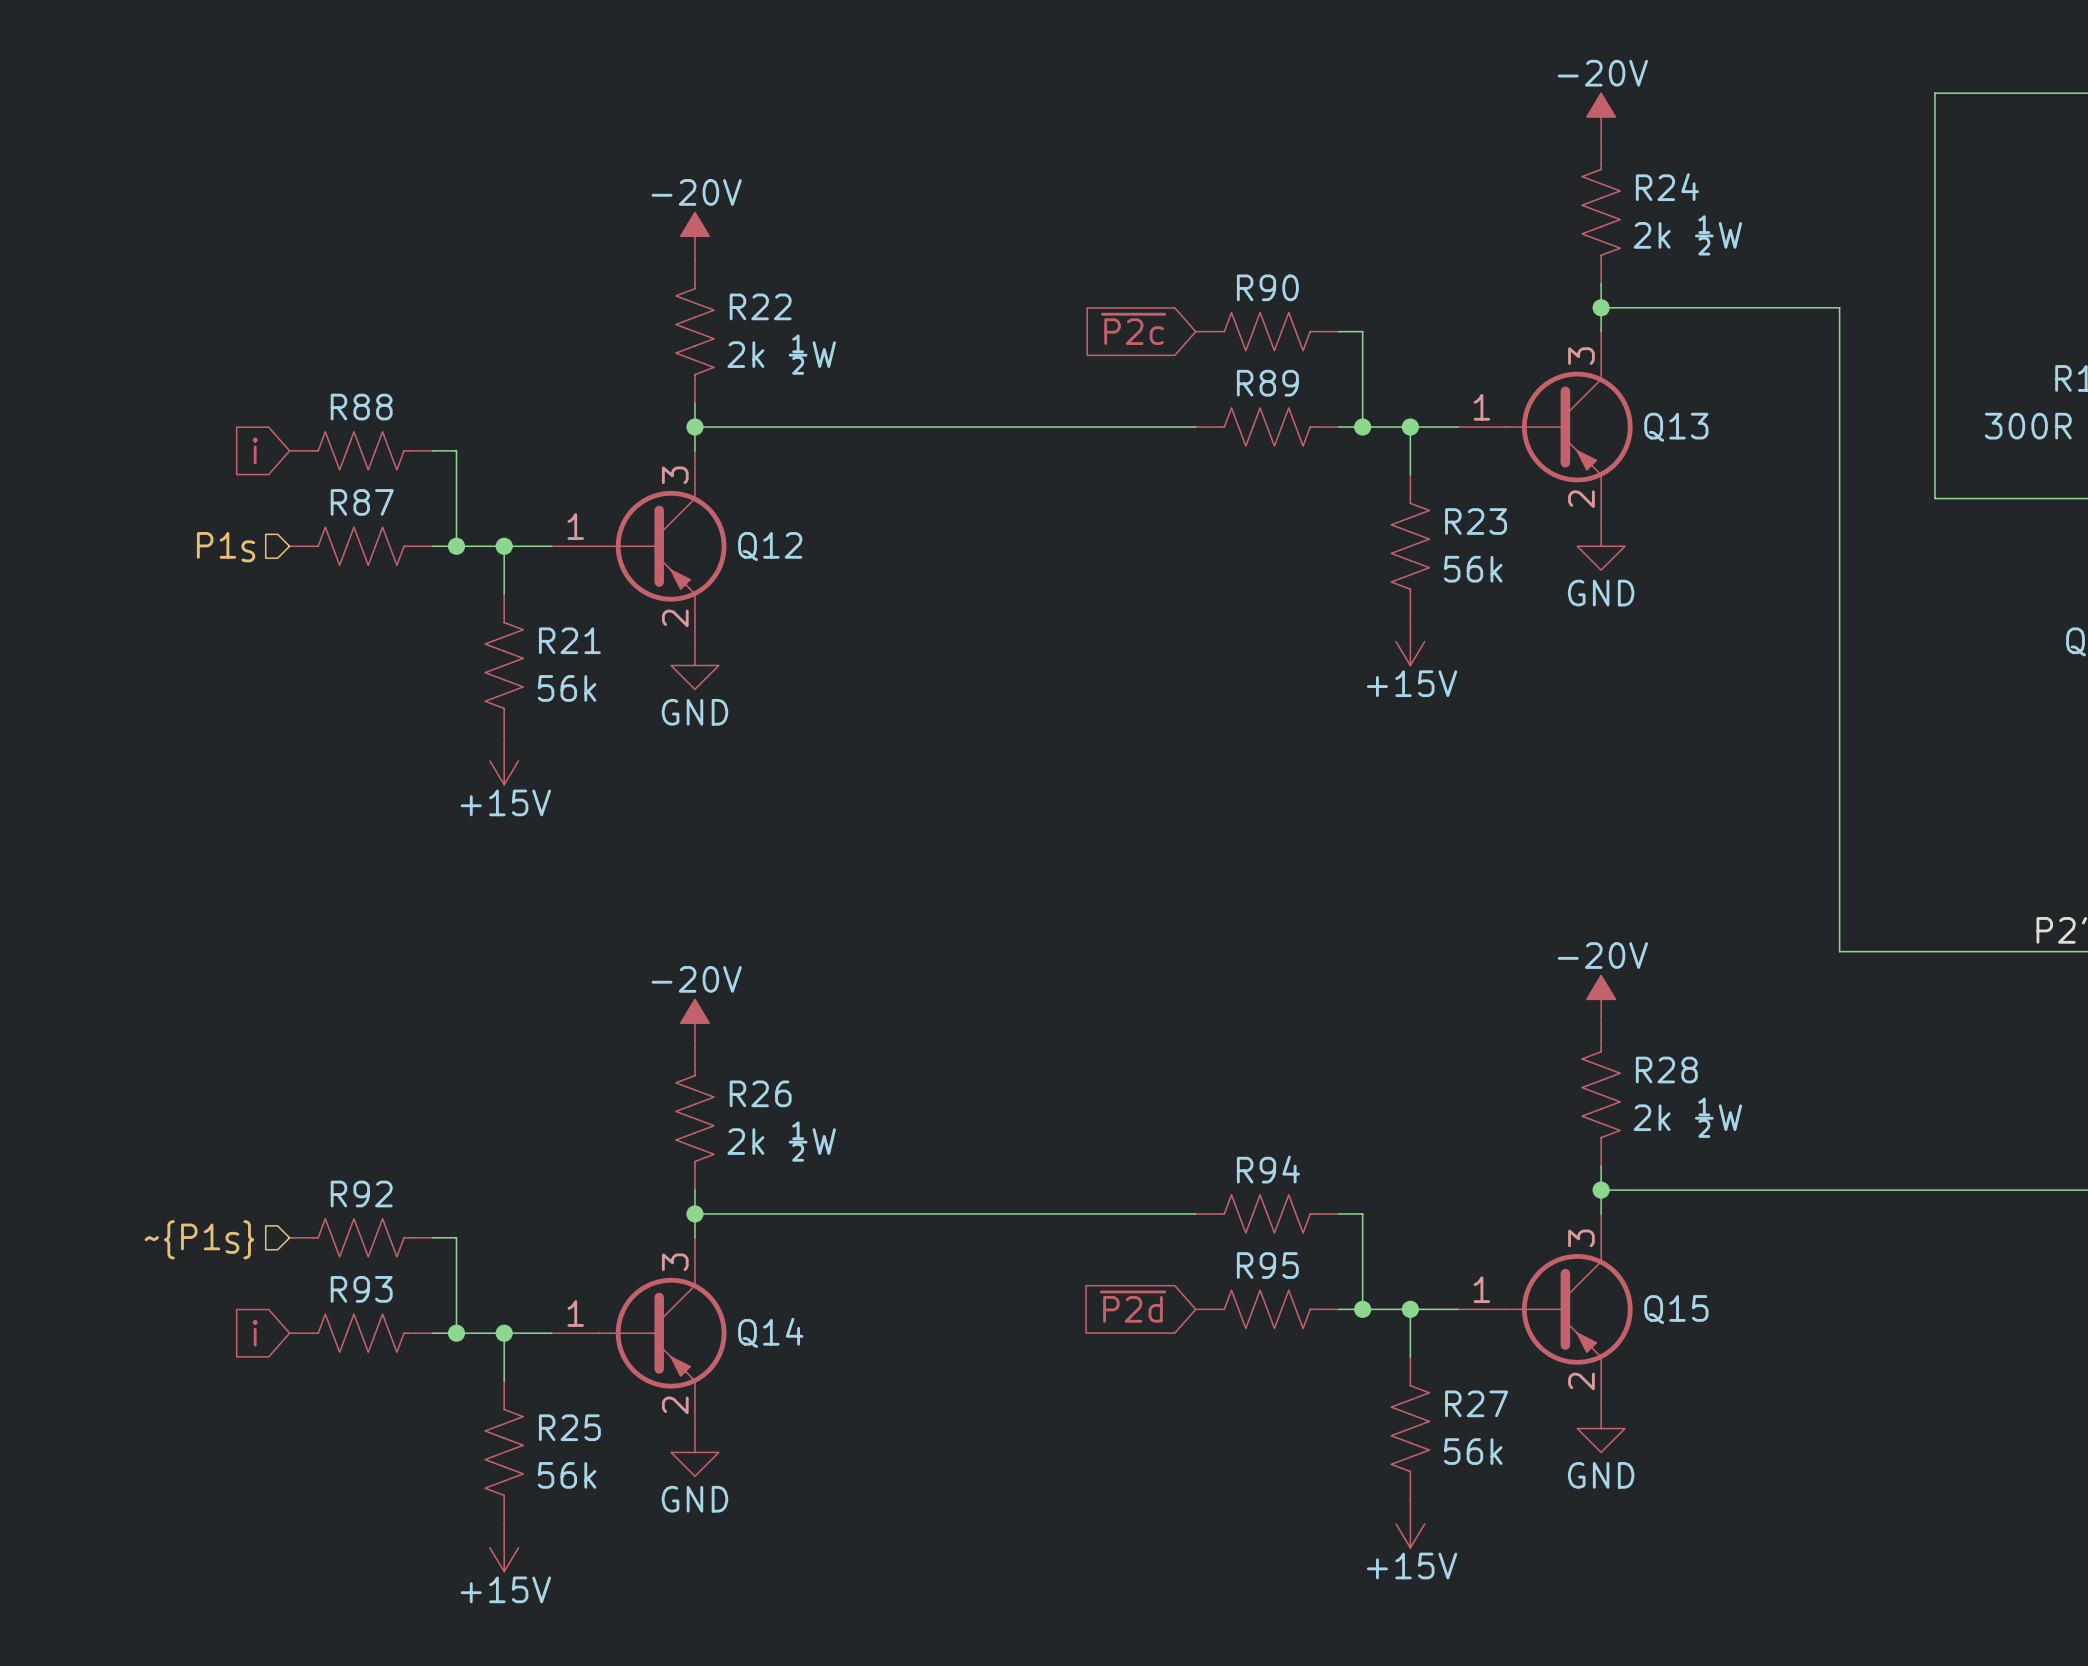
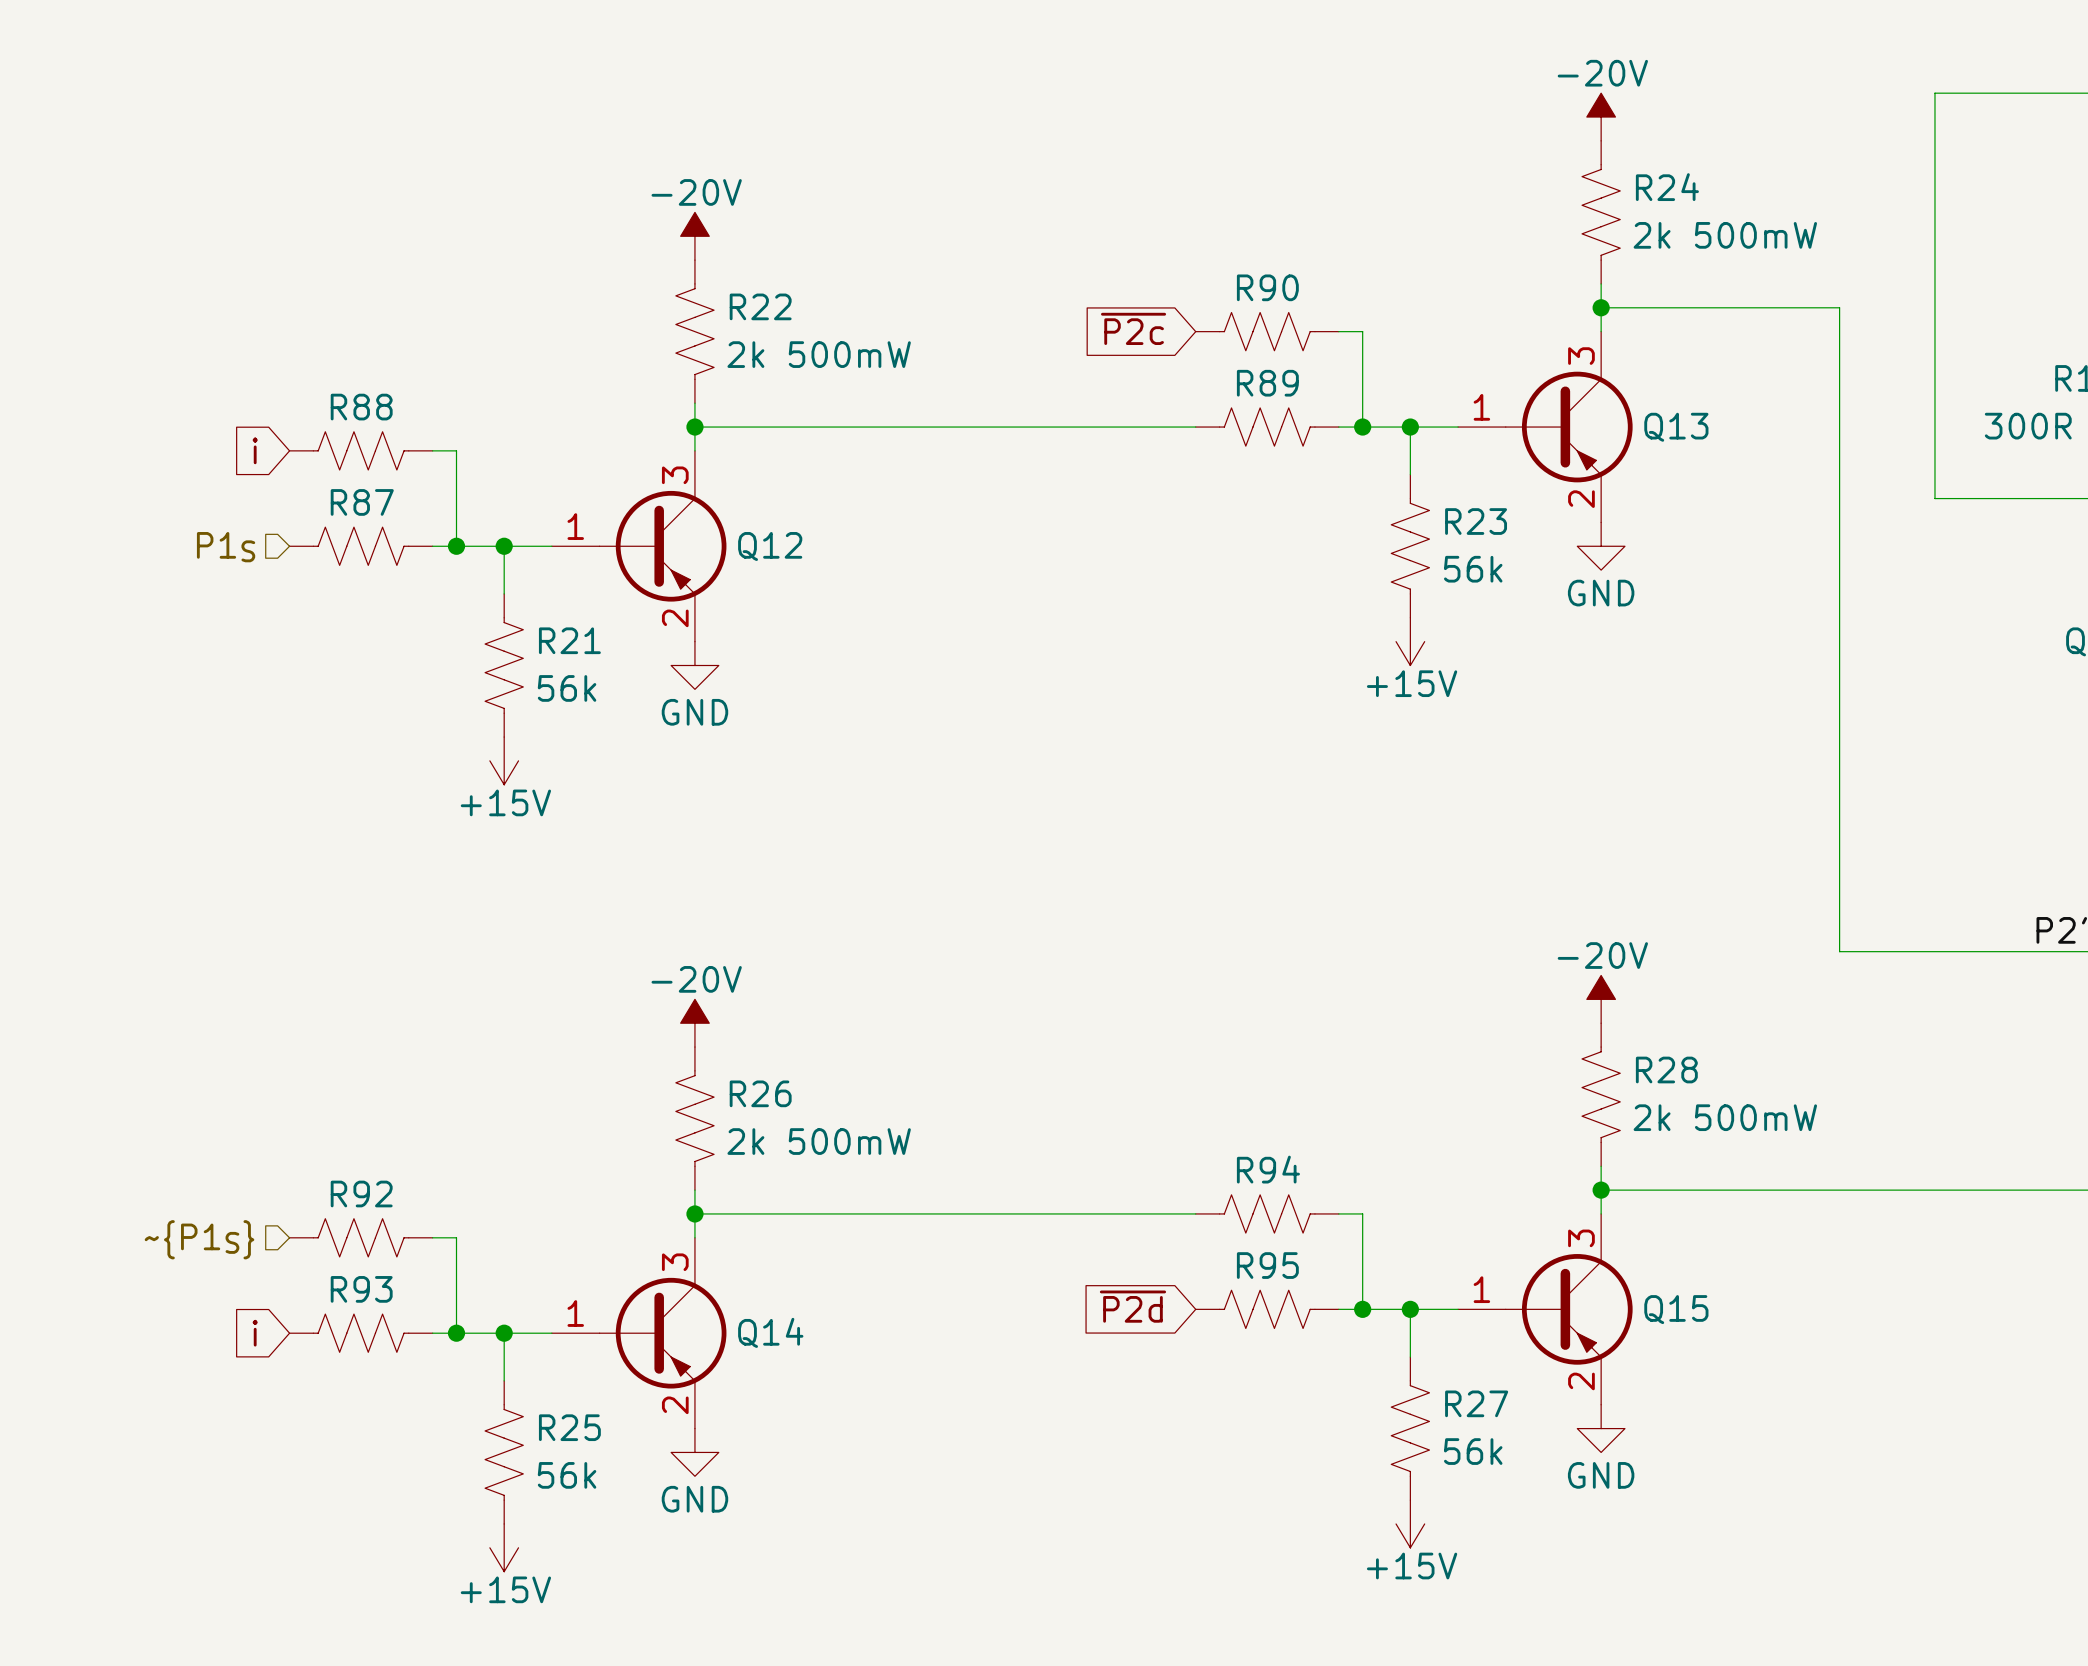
R24 value: 2k ½W (1687, 235) -> 2k 500mW (1725, 235)
R22 value: 2k ½W (781, 354) -> 2k 500mW (819, 354)
R28 value: 2k ½W (1687, 1117) -> 2k 500mW (1725, 1117)
R26 value: 2k ½W (781, 1141) -> 2k 500mW (819, 1141)

